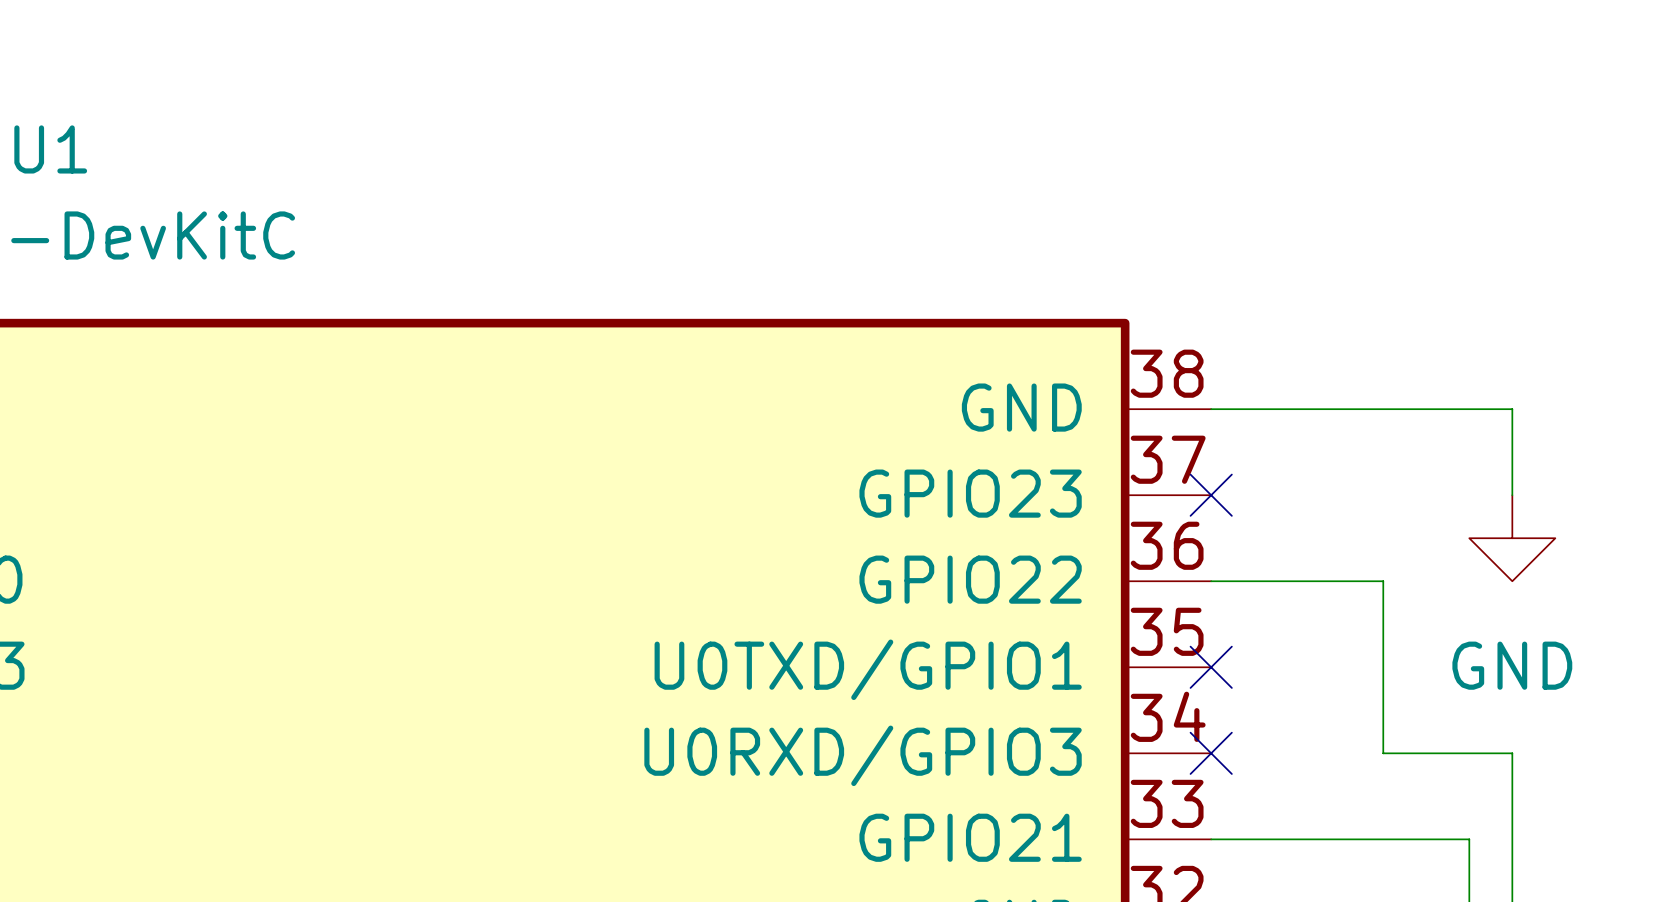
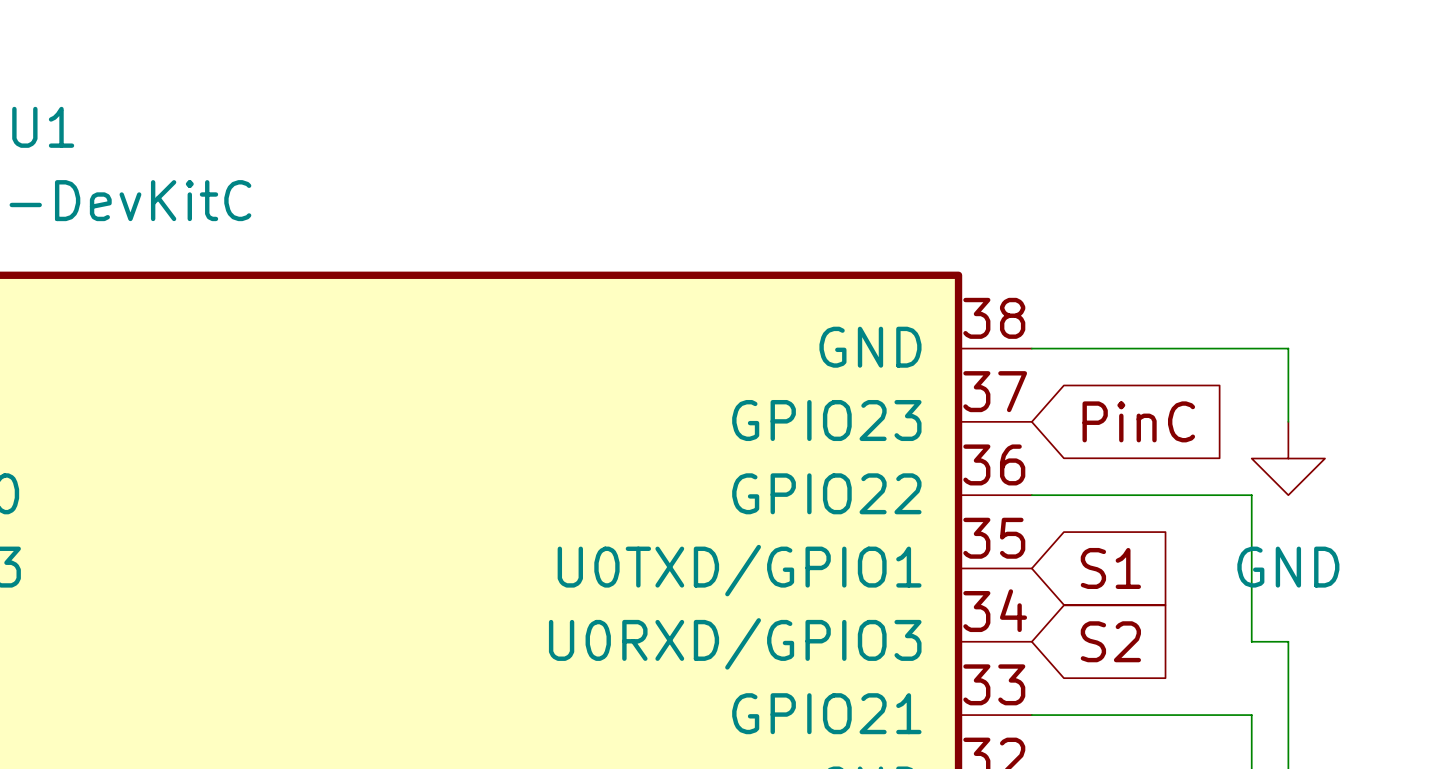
no-connect mark: (1211, 495) -> none
global label: none -> PinC (1138, 421)
wire: (1383, 581) (1383, 753) (1469, 753) -> (1178, 495) (1251, 495) (1251, 641)
no-connect mark: (1211, 667) -> none
global label: none -> S1 (1110, 568)
no-connect mark: (1211, 753) -> none
global label: none -> S2 (1110, 641)

